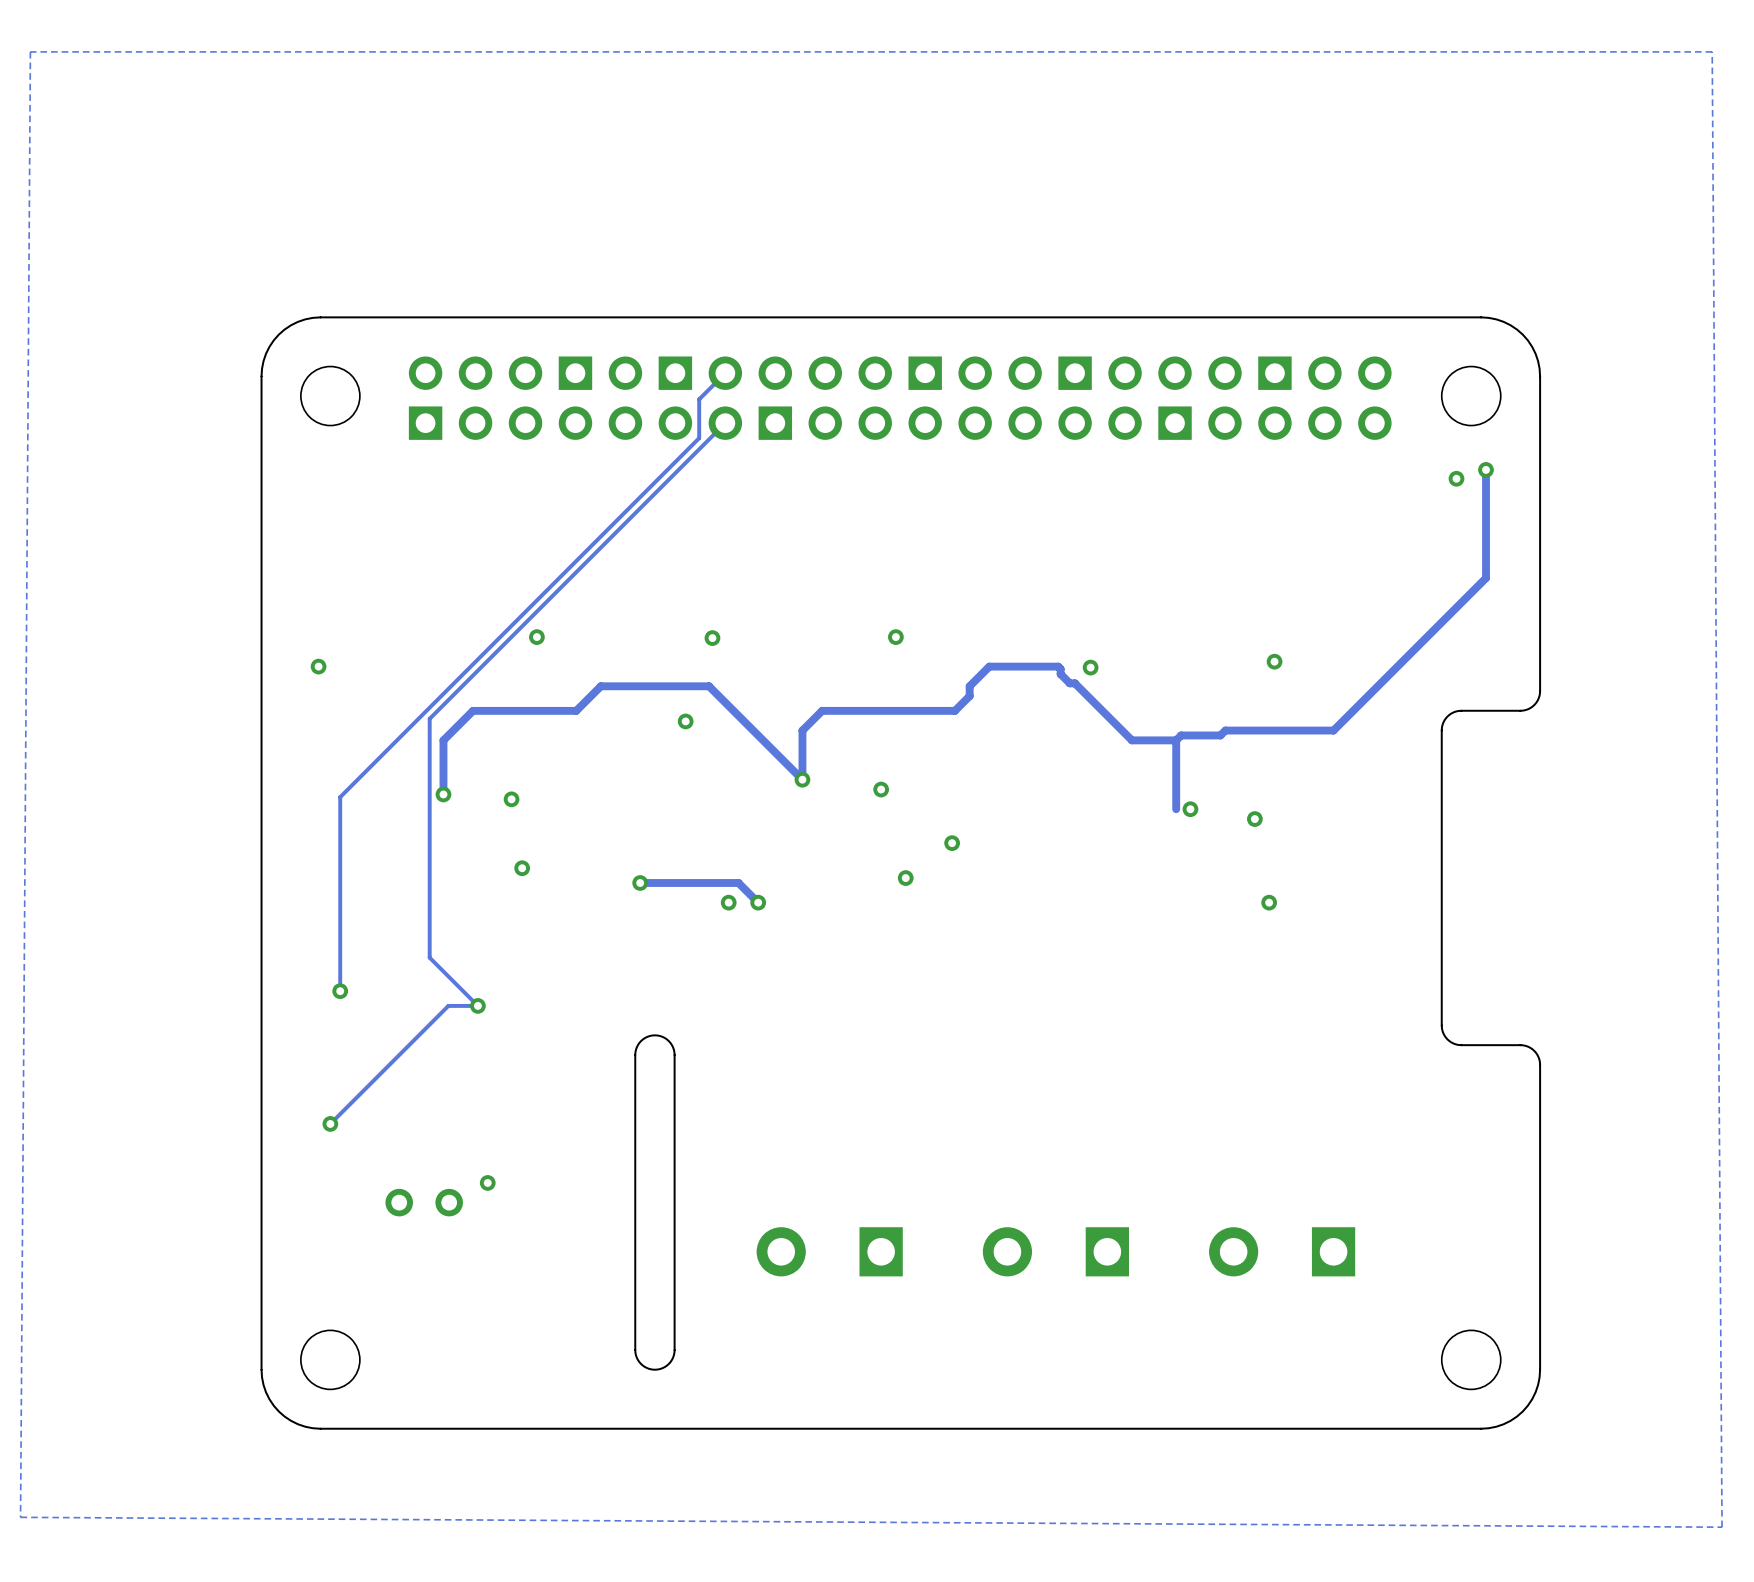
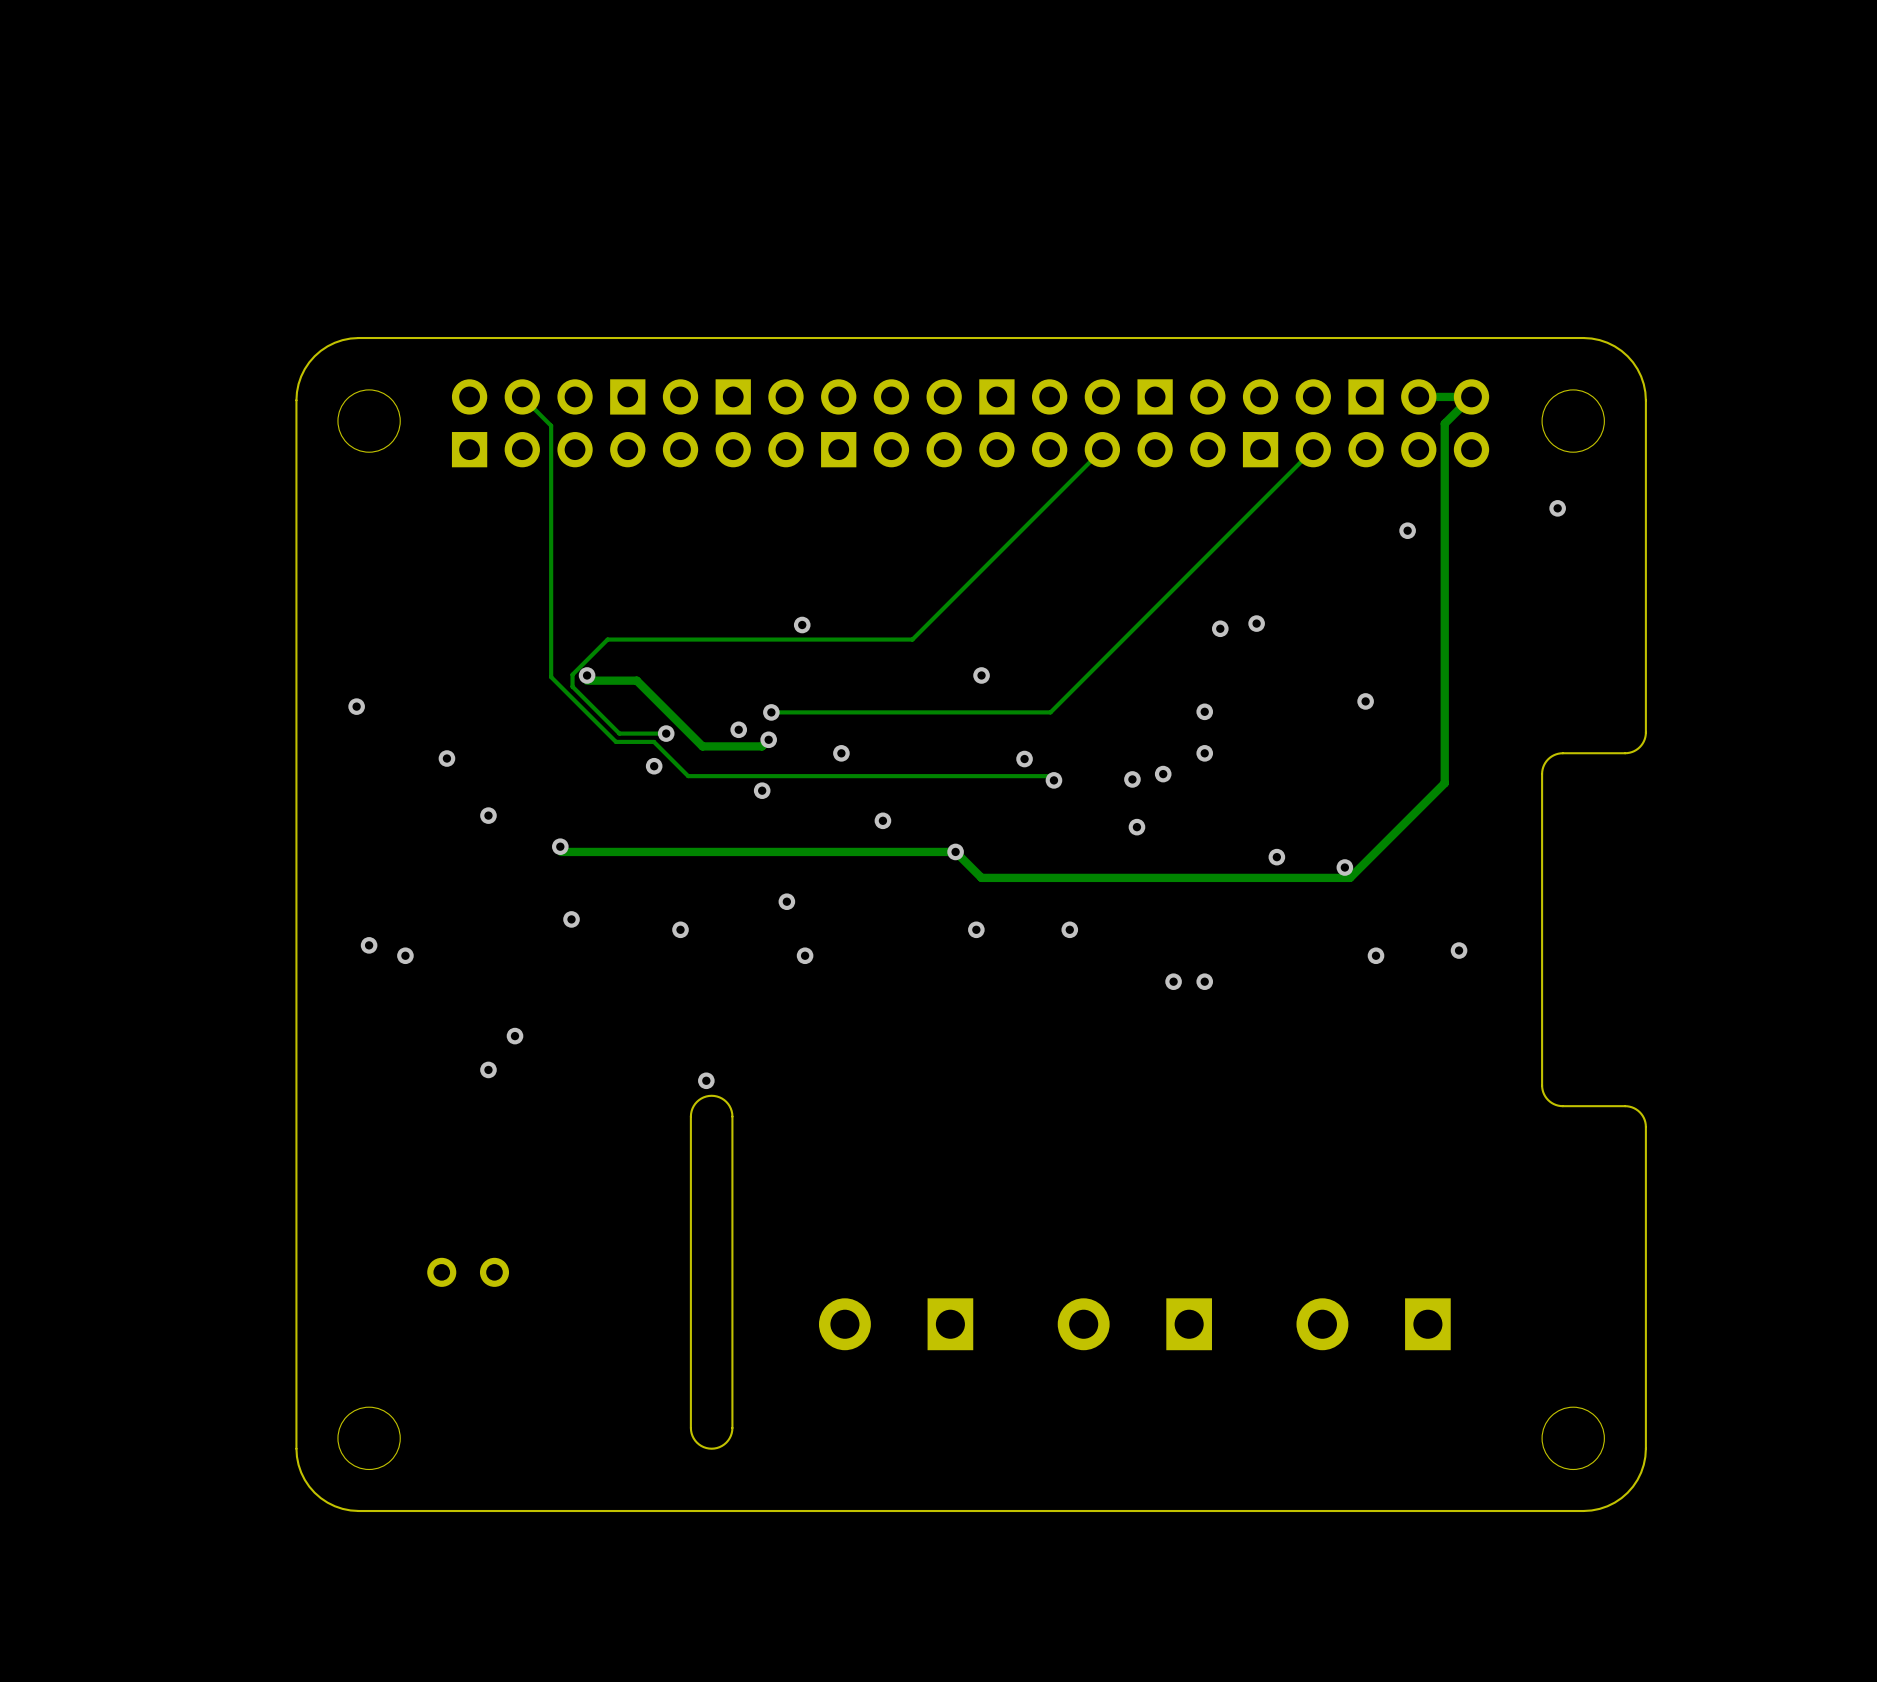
zone outline: (1712, 51) (30, 51) (20, 1517) (1722, 1527) (1712, 51) -> none
track: none -> (522, 396) (551, 425) (551, 677) (615, 741) (653, 741) (688, 776) (1049, 776) (1053, 780)
track: (725, 373) (699, 399) (699, 438) (340, 797) (340, 991) -> none
track: none -> (1418, 396) (1471, 396) (1444, 423) (1444, 783) (1350, 877) (981, 877) (955, 851) (561, 851)
track: (725, 423) (429, 718) (429, 957) (477, 1005) (448, 1005) (330, 1123) -> none
track: none -> (1102, 449) (912, 639) (607, 639) (572, 674) (572, 686) (619, 733) (666, 733)
track: none -> (1313, 449) (1050, 712) (771, 712)
track: (1486, 469) (1486, 578) (1333, 730) (1225, 730) (1220, 735) (1181, 735) (1176, 740) -> none
via: (1486, 469) -> none
via: none -> (1407, 530)
via: none -> (1256, 623)
via: none -> (802, 625)
via: none -> (1220, 628)
via position: (895, 637) -> (981, 675)
via: (712, 638) -> none
track: none -> (587, 680) (636, 680) (702, 746) (762, 746) (768, 739)
via: (1090, 667) -> none
via: none -> (1204, 711)
via: none -> (771, 712)
via: none -> (738, 729)
via: none -> (666, 733)
via: none -> (768, 739)
via: none -> (841, 753)
via: none -> (1204, 753)
via: none -> (446, 758)
via: none -> (1024, 759)
via: (685, 721) -> none
via: none -> (654, 766)
via: none -> (1163, 774)
via: none -> (1132, 779)
via: none -> (1053, 780)
track: (1176, 740) (1131, 740) (1074, 683) (1069, 683) (1060, 674) (1060, 669) (1058, 666) (989, 666) (969, 686) (969, 696) (954, 710) (822, 710) (802, 730) (802, 779) (709, 686) (600, 686) (576, 710) (472, 710) (443, 740) (443, 794) -> none
track: (1176, 740) (1176, 809) -> none
via: none -> (762, 790)
via position: (802, 779) -> (882, 820)
via: none -> (1136, 827)
via position: (881, 789) -> (955, 851)
via position: (443, 794) -> (488, 815)
via: (952, 843) -> none
via: none -> (786, 901)
via: none -> (1069, 929)
track: (640, 882) (738, 882) (758, 902) -> none
via position: (640, 882) -> (680, 929)
via: none -> (369, 945)
via: none -> (1459, 950)
via: none -> (405, 955)
via: (728, 902) -> none
via: none -> (805, 955)
via: (758, 902) -> none
via position: (1269, 902) -> (1376, 955)
via: none -> (1173, 981)
via: none -> (1204, 981)
via: none -> (515, 1036)
via: (340, 991) -> none
via: (477, 1005) -> none
via: none -> (488, 1069)
via: none -> (706, 1080)
via: (330, 1123) -> none
via: (487, 1182) -> none

